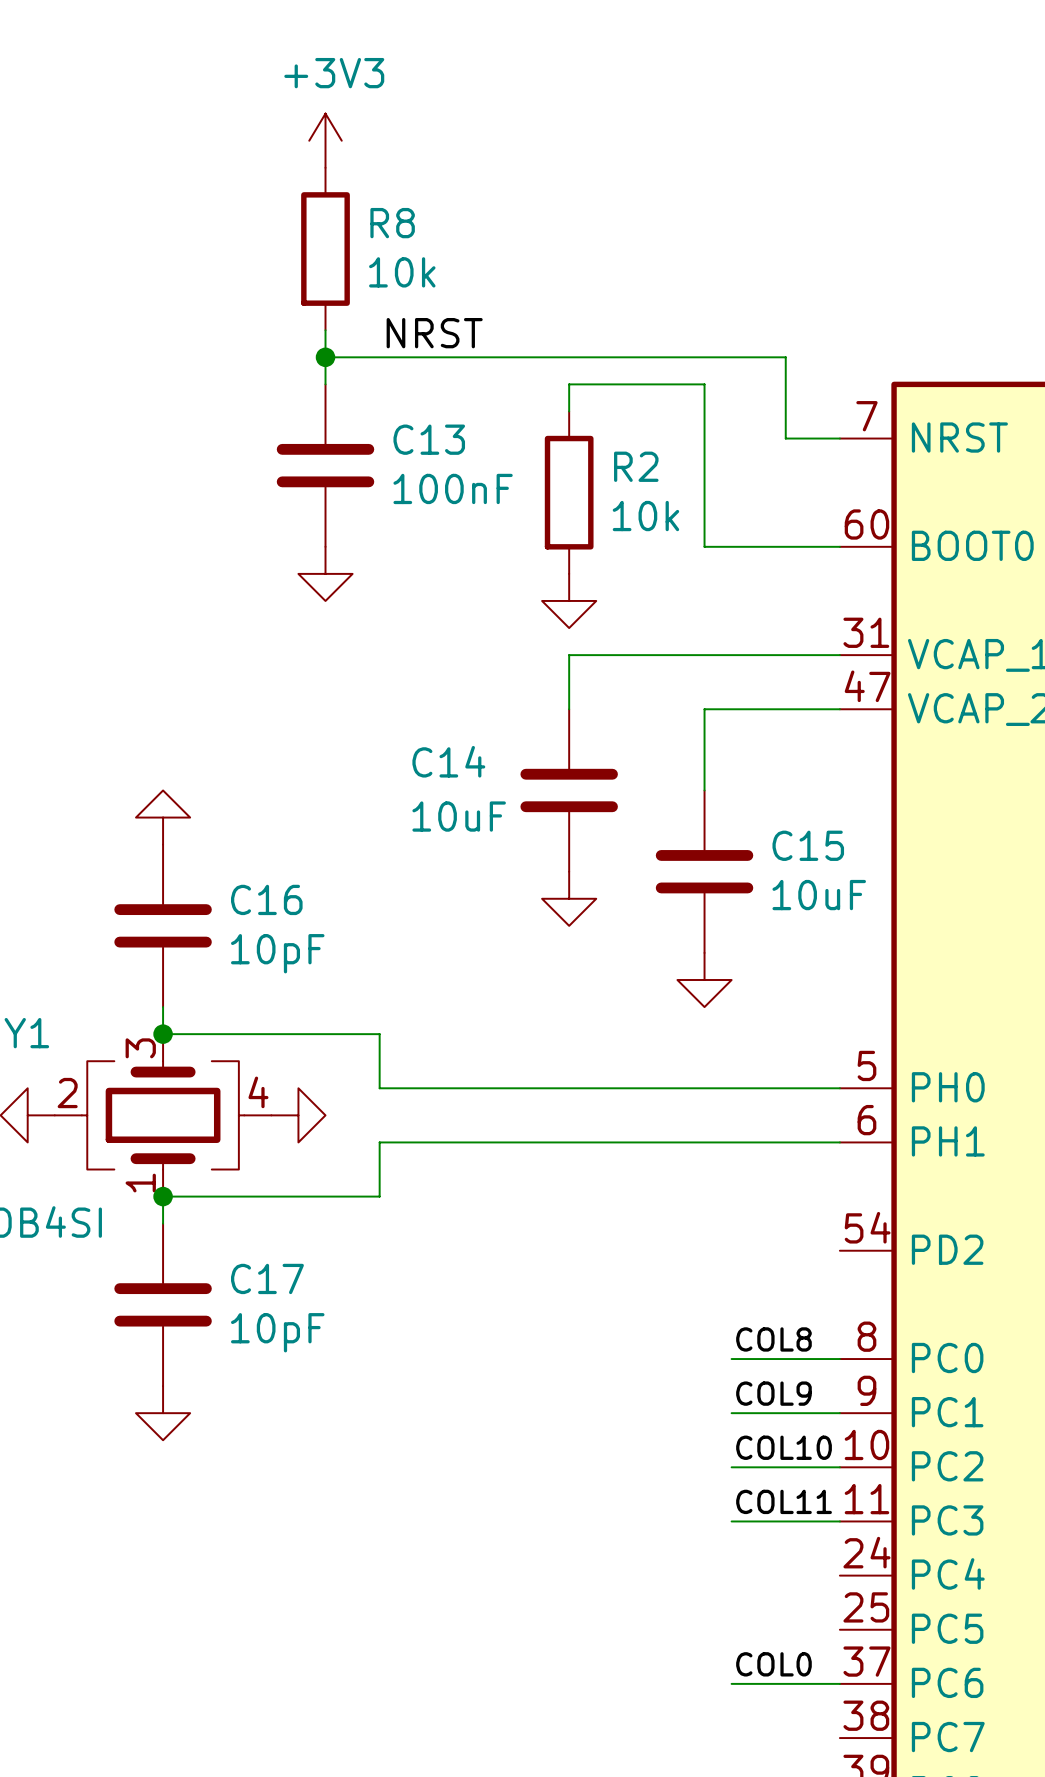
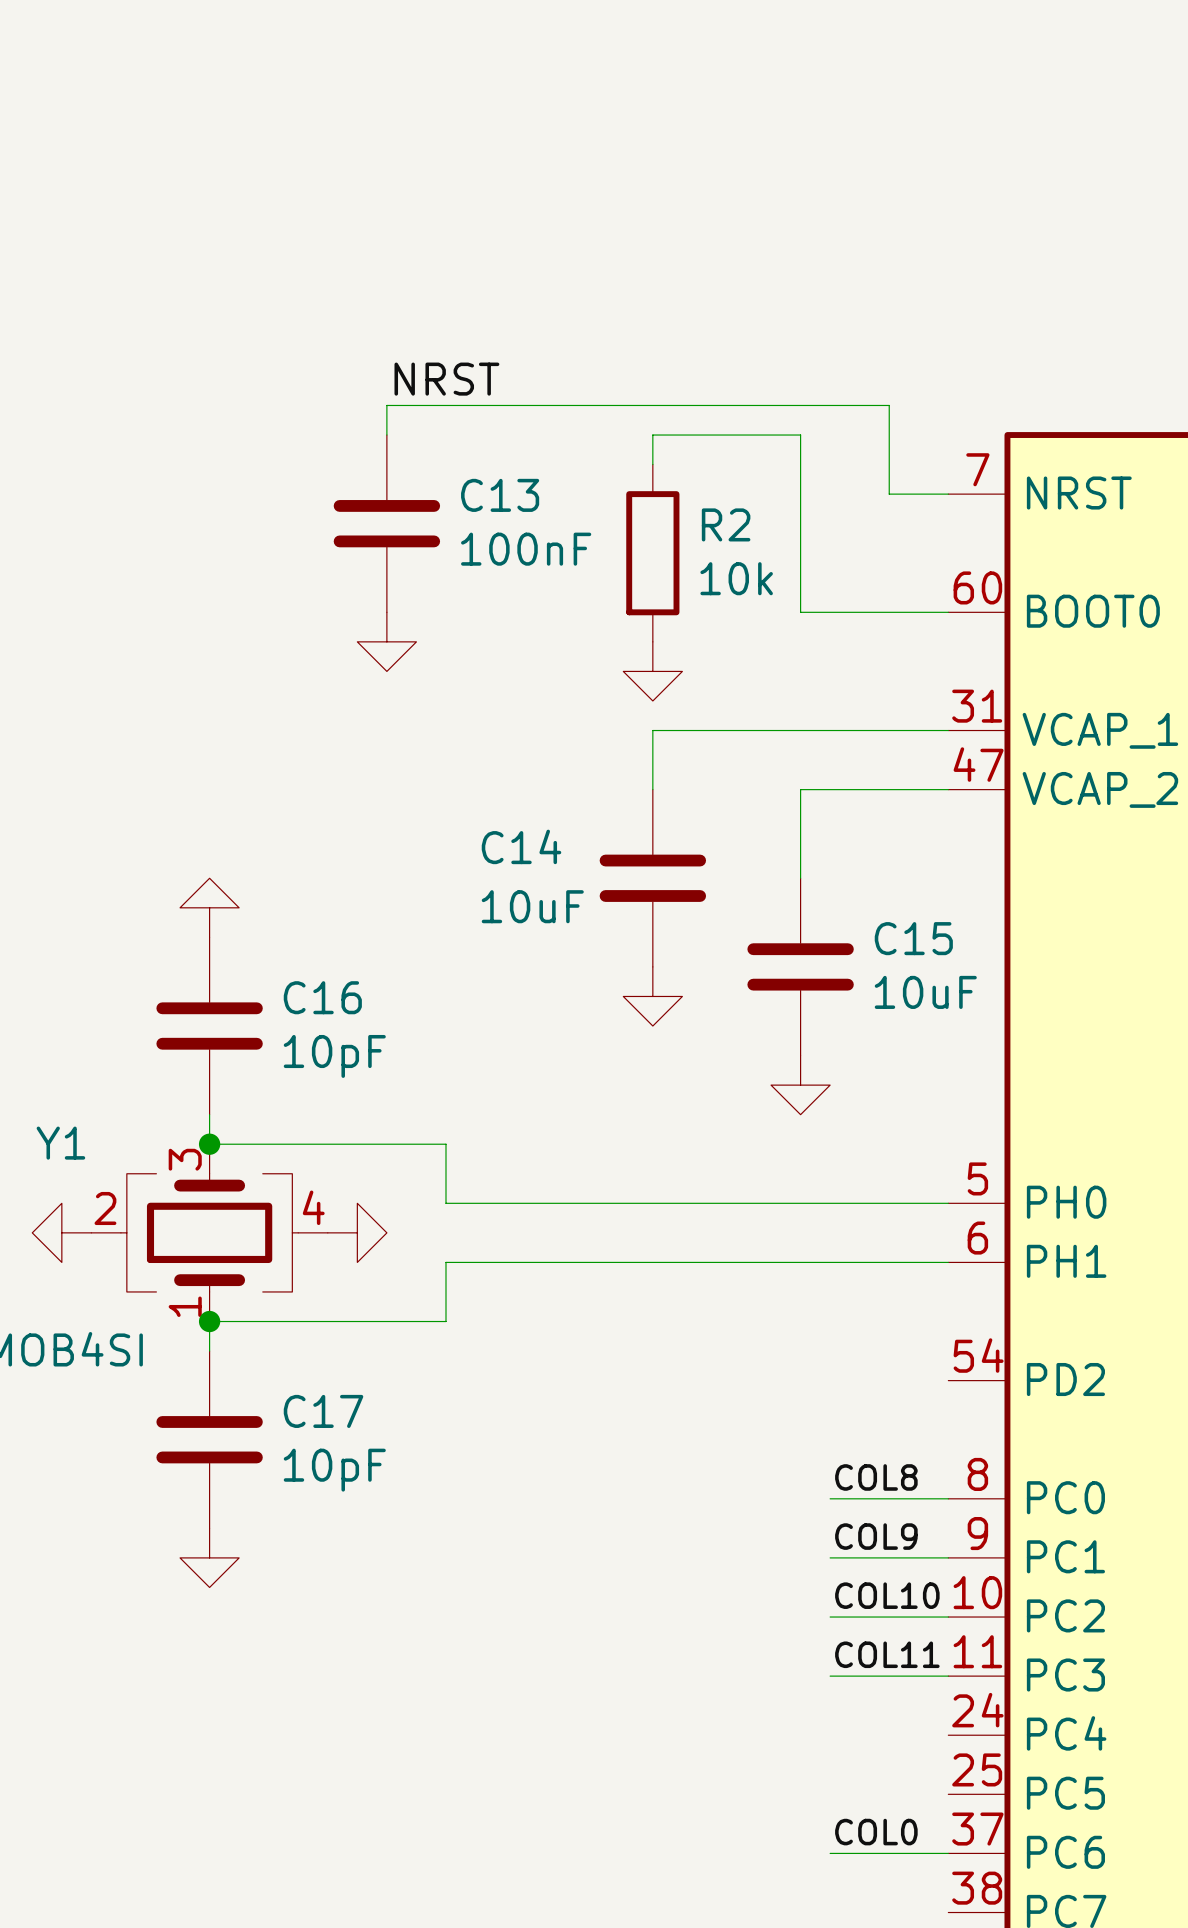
power symbol: +3V3 (325, 140) -> none
R8: 10k (325, 249) -> none
wire: (325, 330) (325, 357) -> none
label position: NRST (434, 333) -> NRST (446, 379)
junction: (325, 357) -> none

